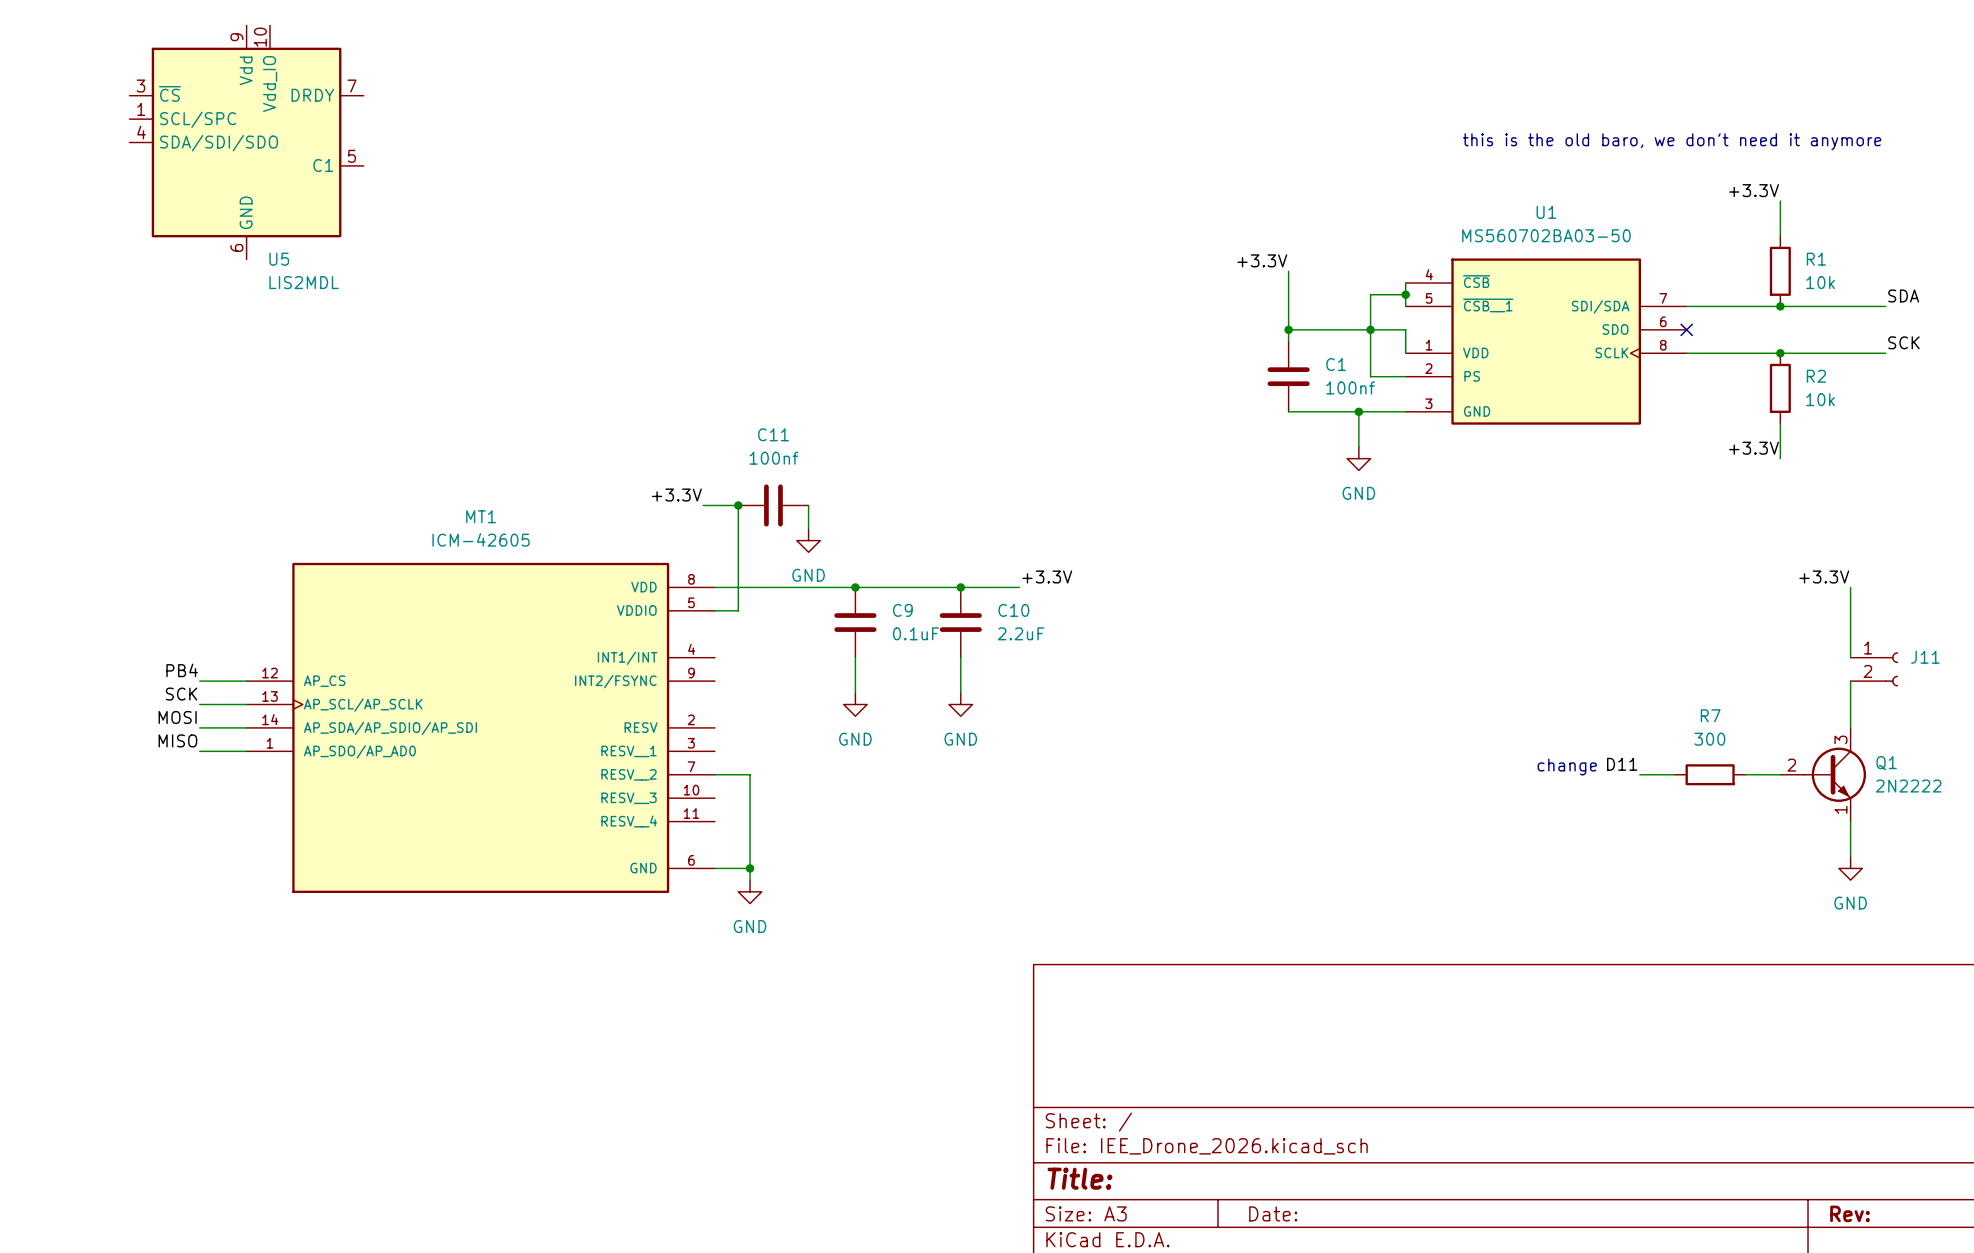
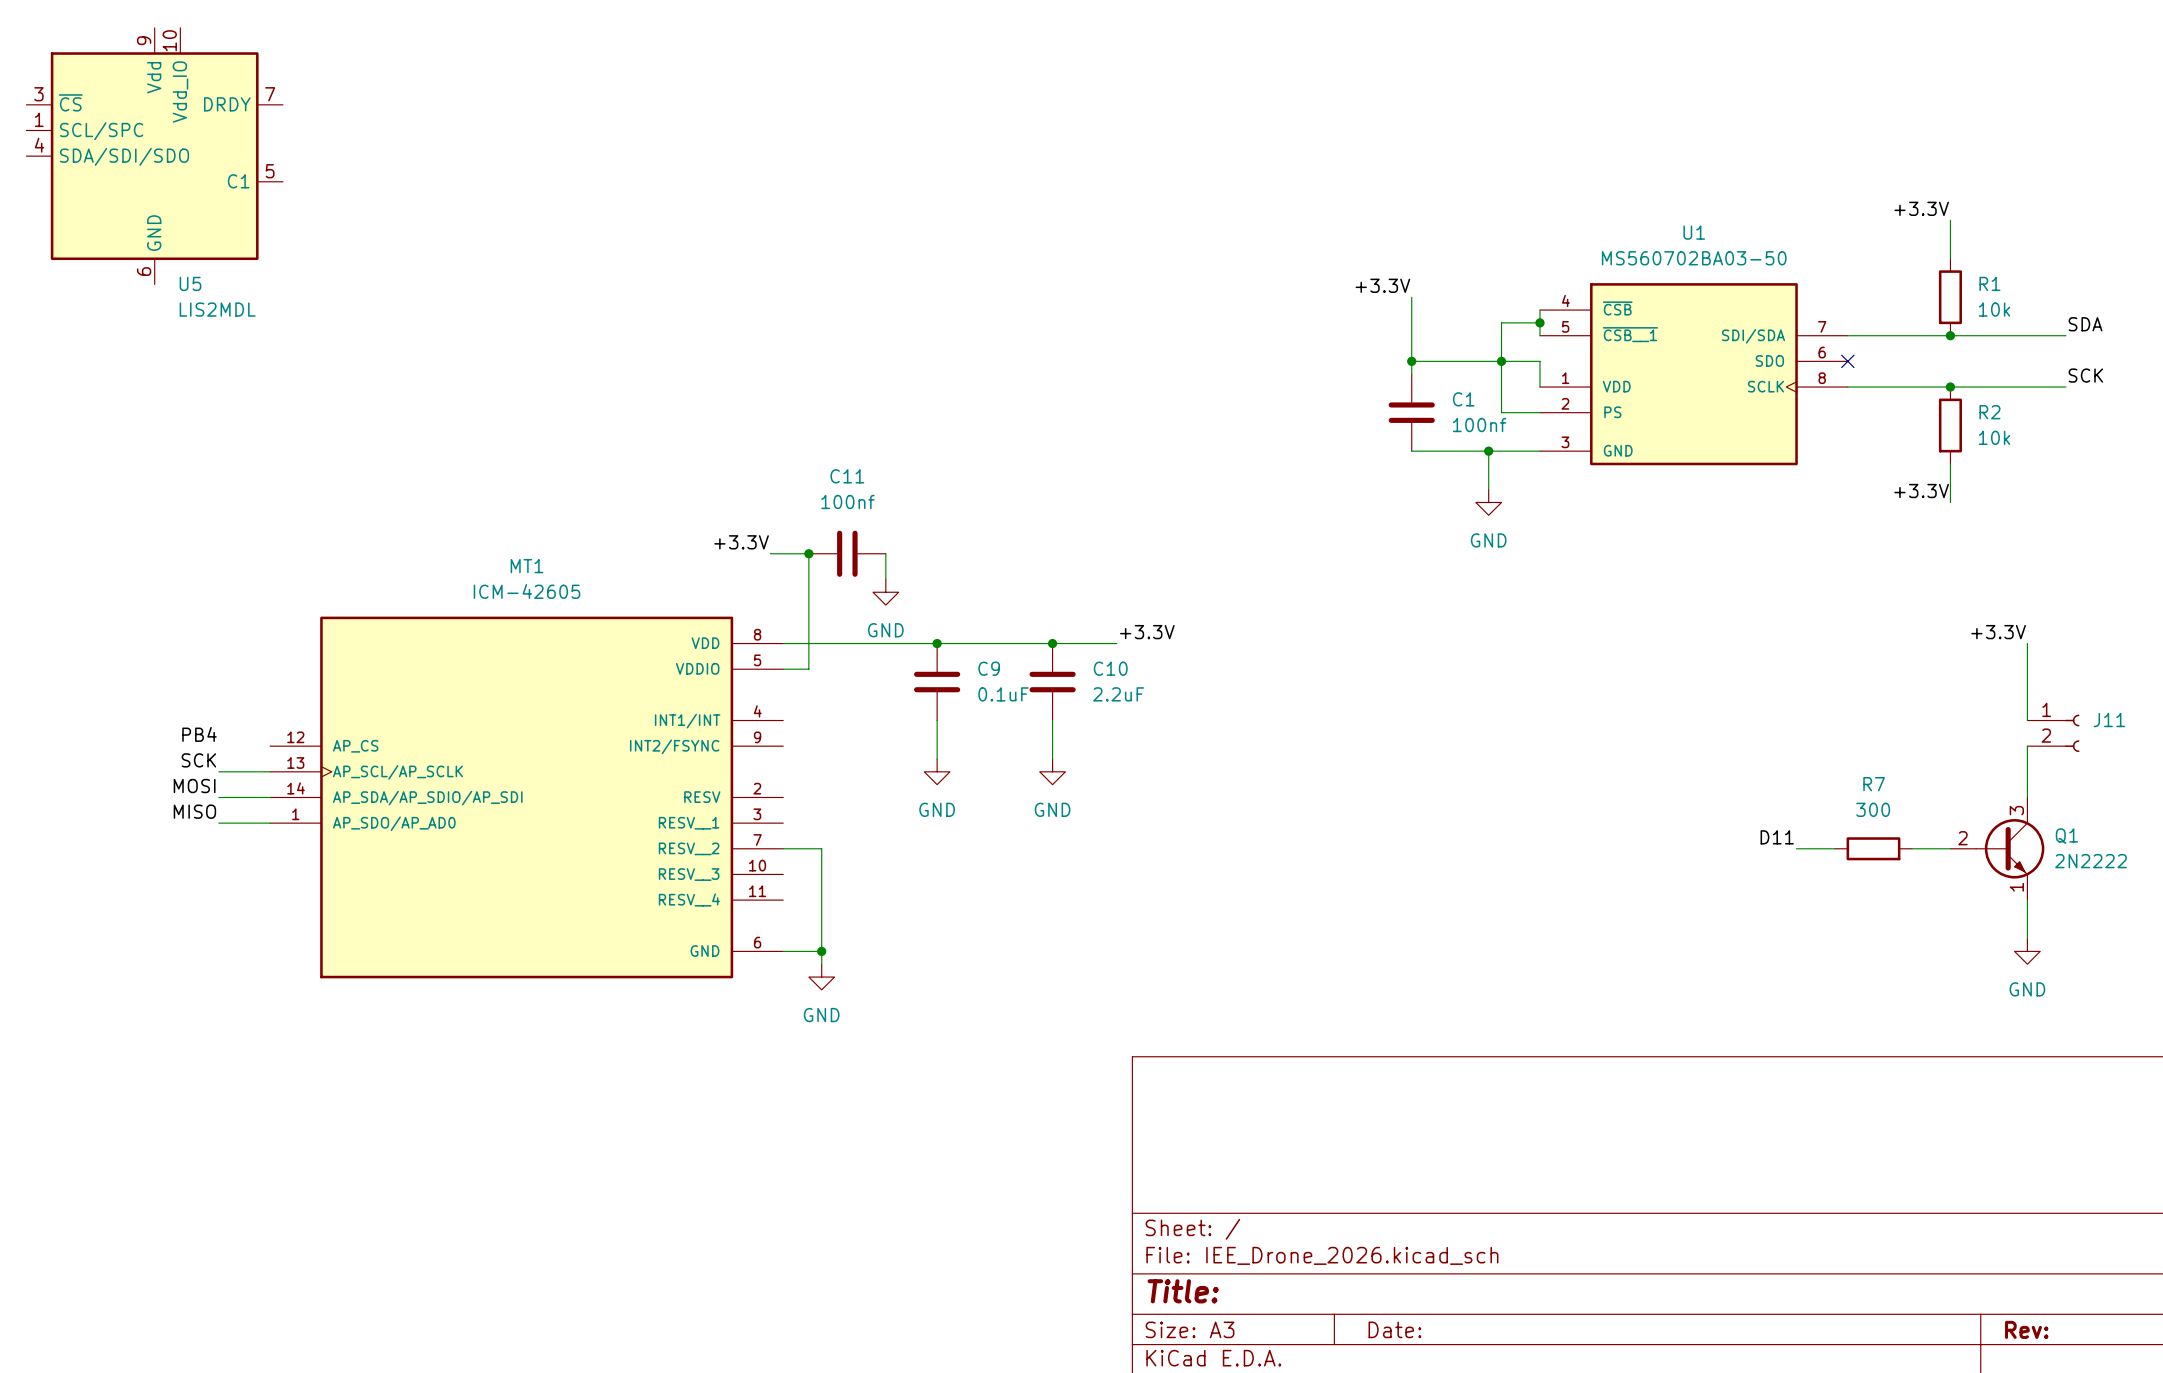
text: this is the old baro, we don't need it anymore (1672, 141) -> none
U5 position: (246, 142) -> (154, 156)
wire: (199, 681) (246, 681) -> none
text: change (1567, 766) -> none

